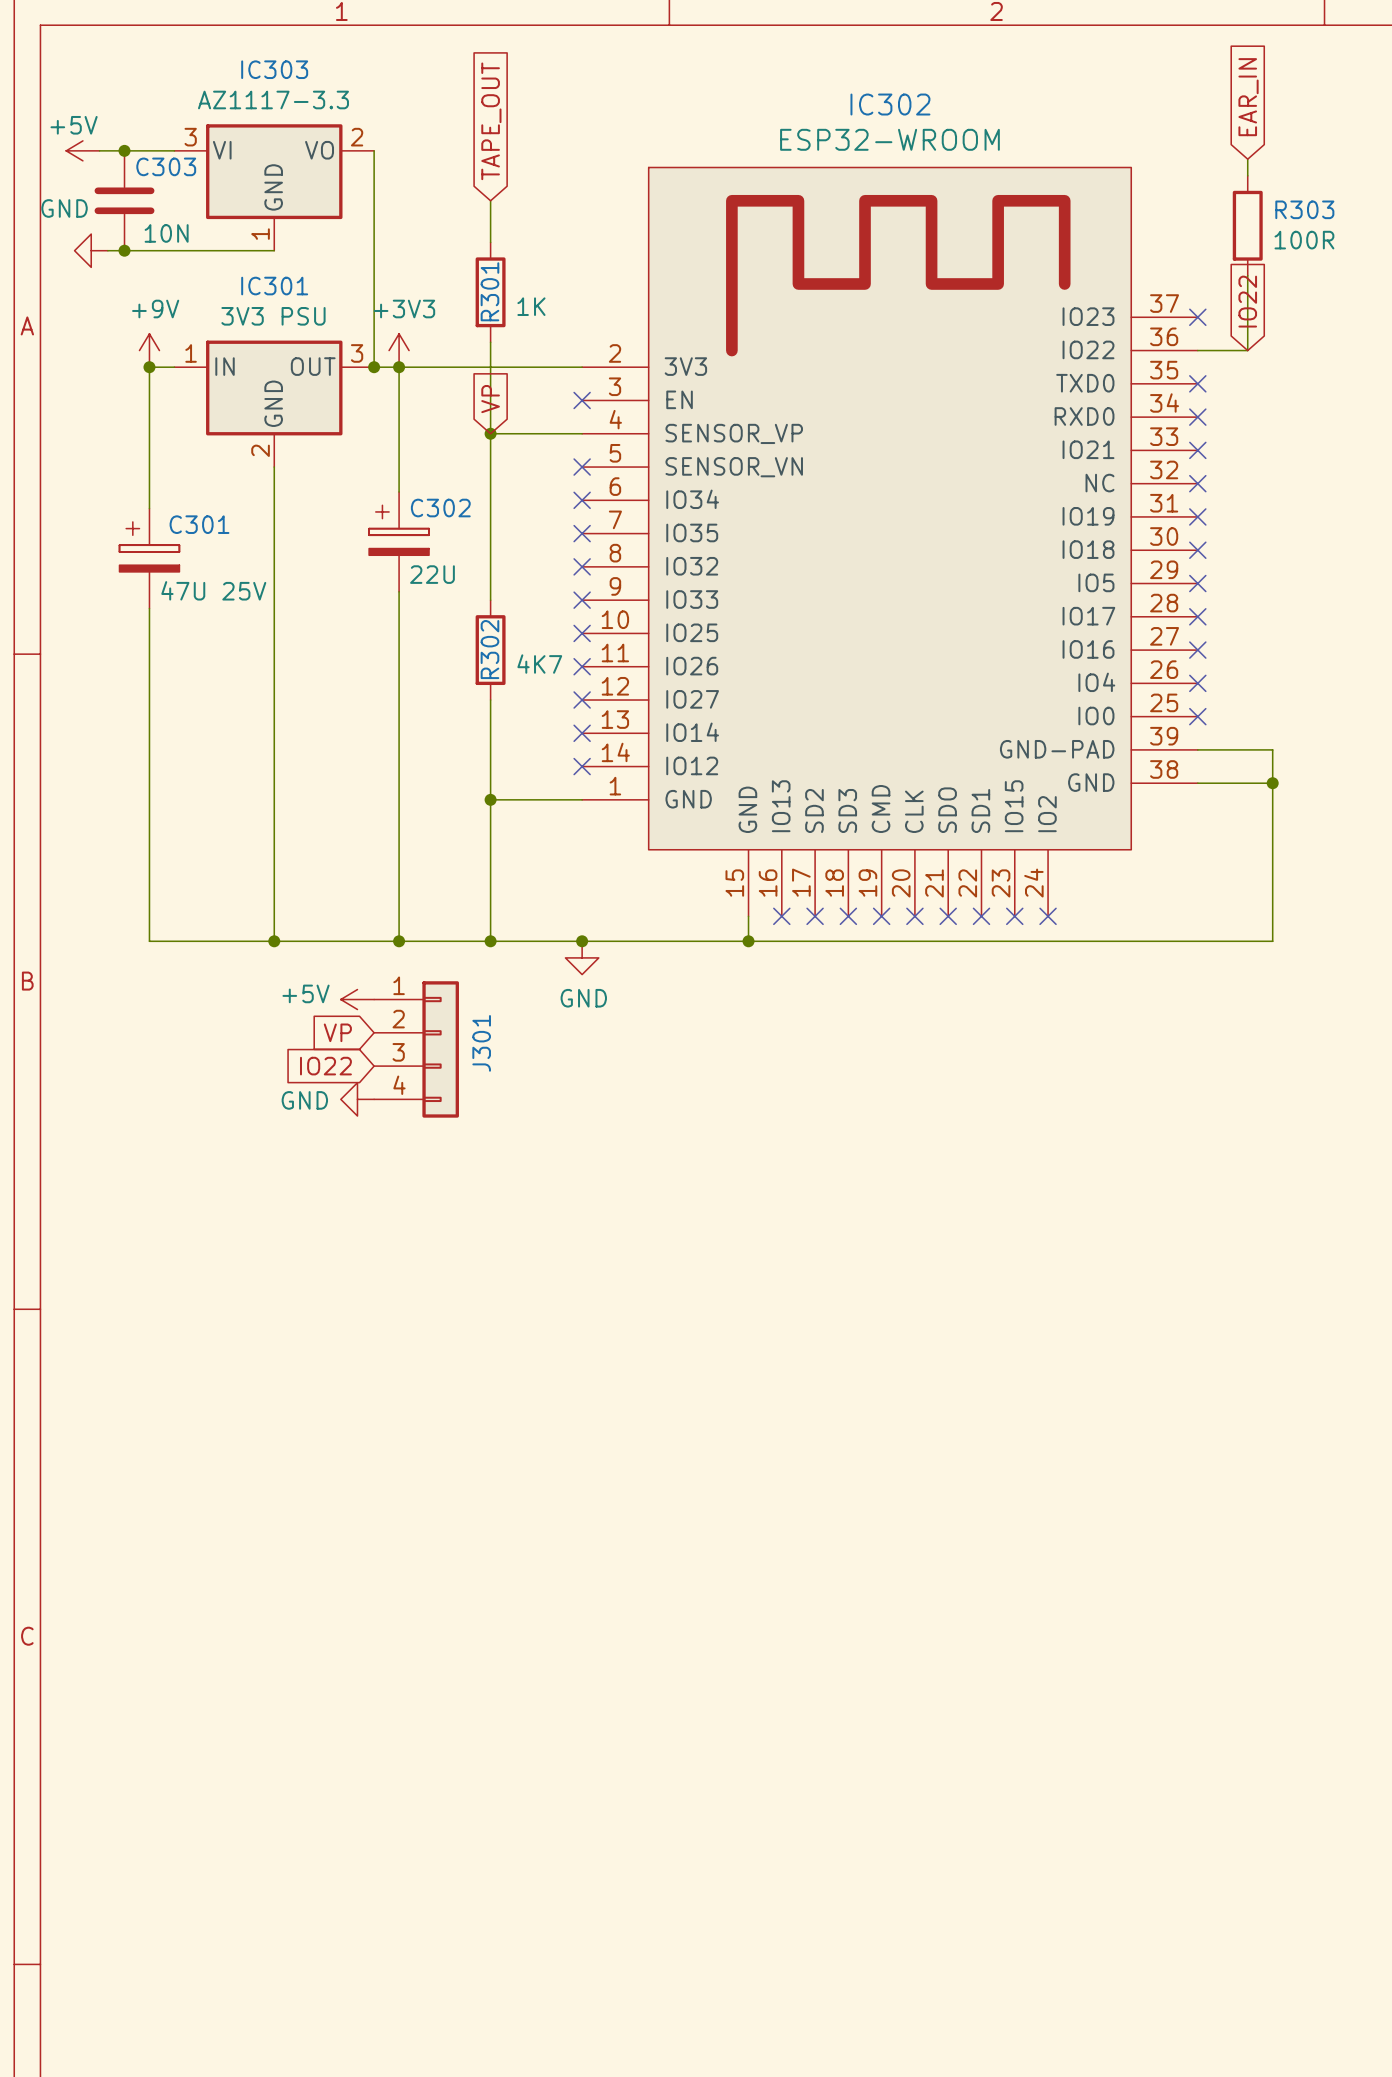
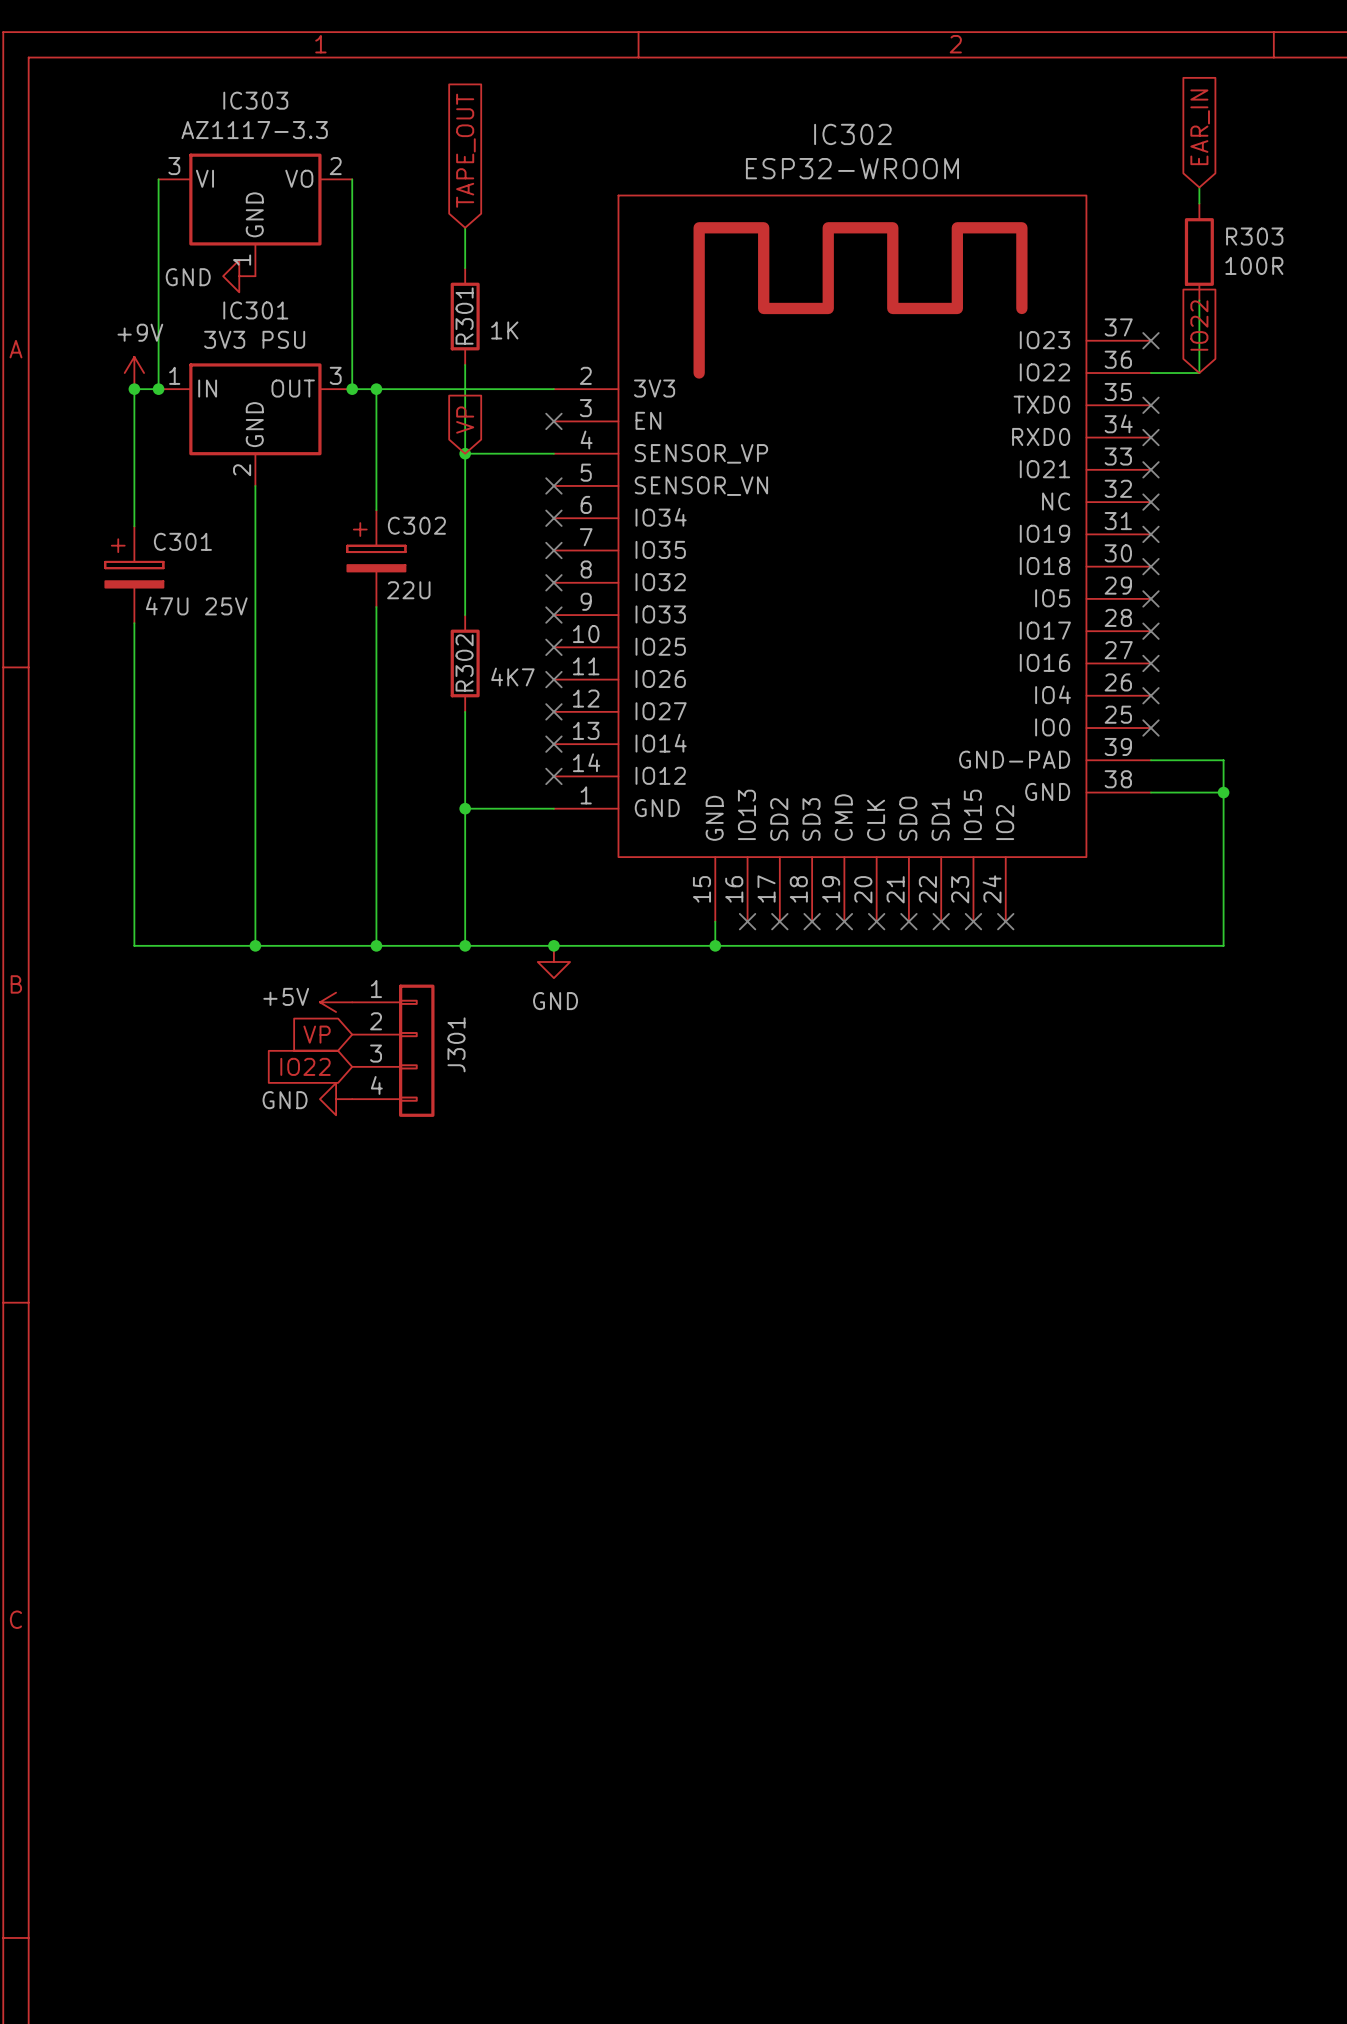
power symbol: +5V (82, 150) -> none
wire: (99, 150) (174, 150) -> (158, 389) (158, 179)
junction: (124, 150) -> none
C303: 10N (124, 200) -> none
power symbol text position: GND (64, 208) -> GND (188, 277)
power symbol position: GND (91, 250) -> GND (239, 276)
wire: (107, 250) (274, 250) -> none
junction: (124, 250) -> none
power symbol: +3V3 (399, 350) -> none
junction: none -> (158, 389)

